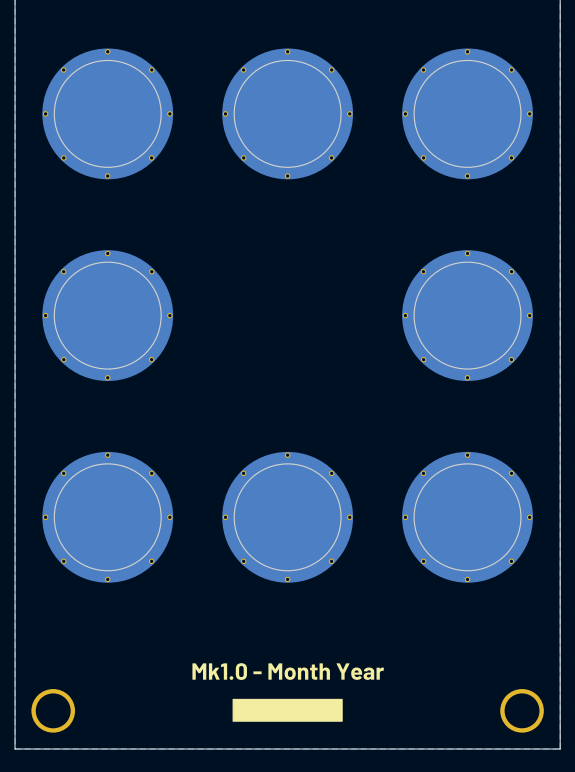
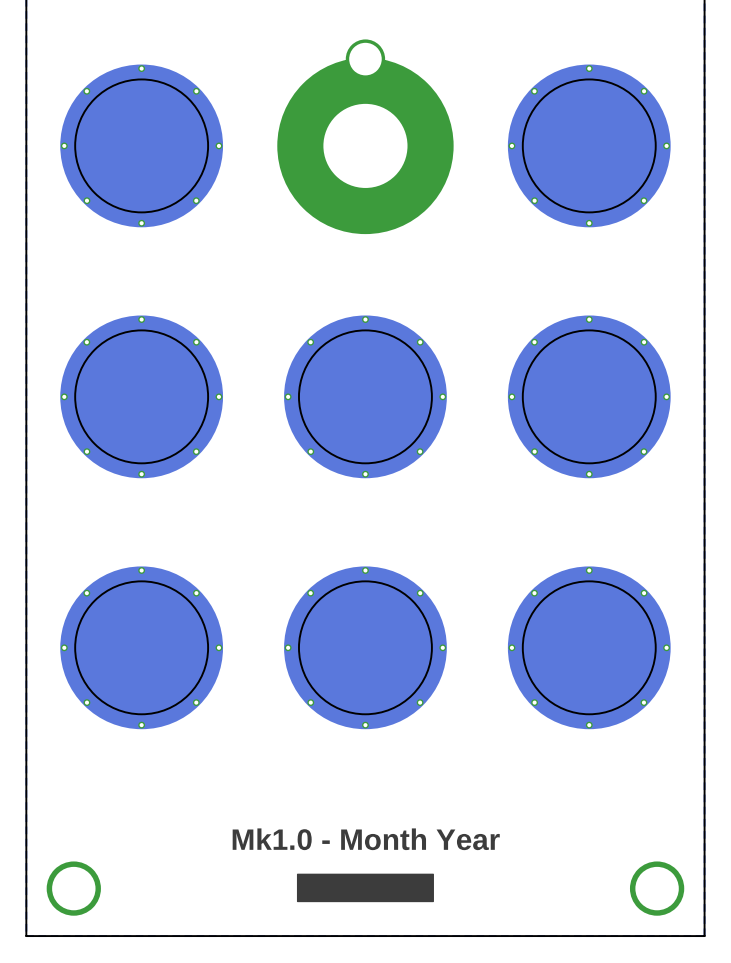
part footprint: [222, 48, 354, 180] -> [277, 39, 454, 235]
part: none -> (365, 396)

